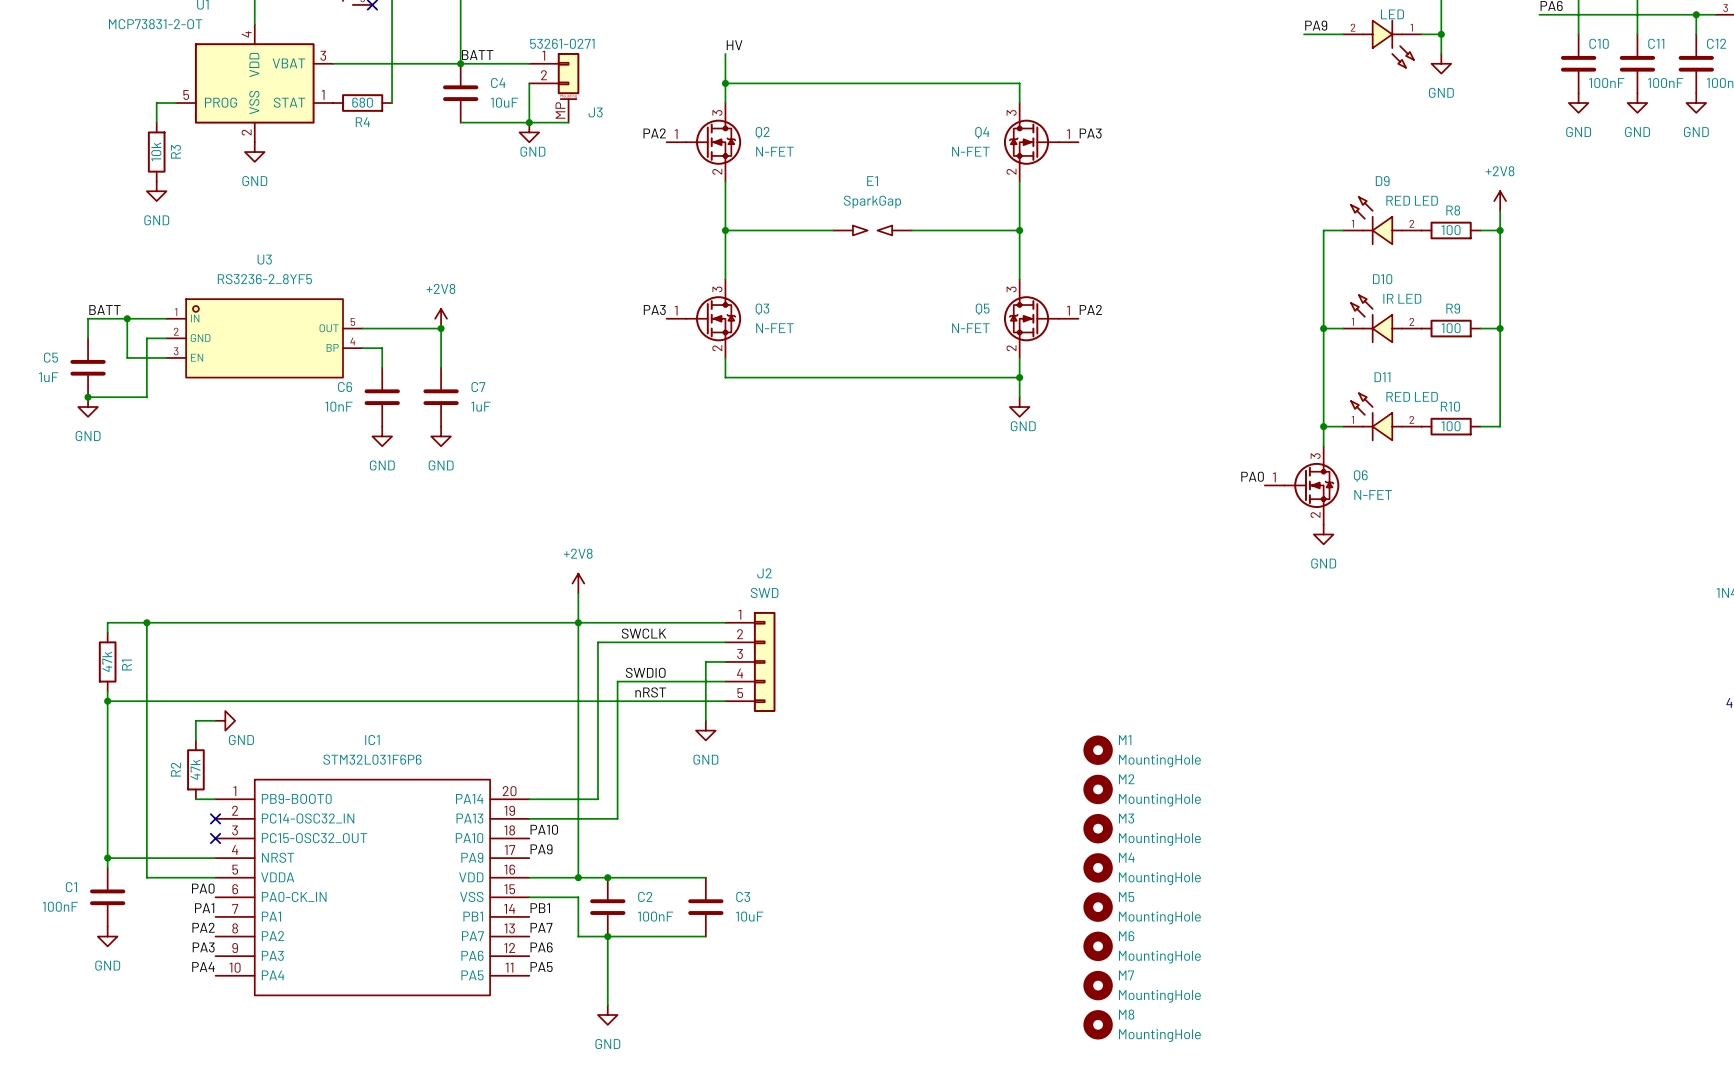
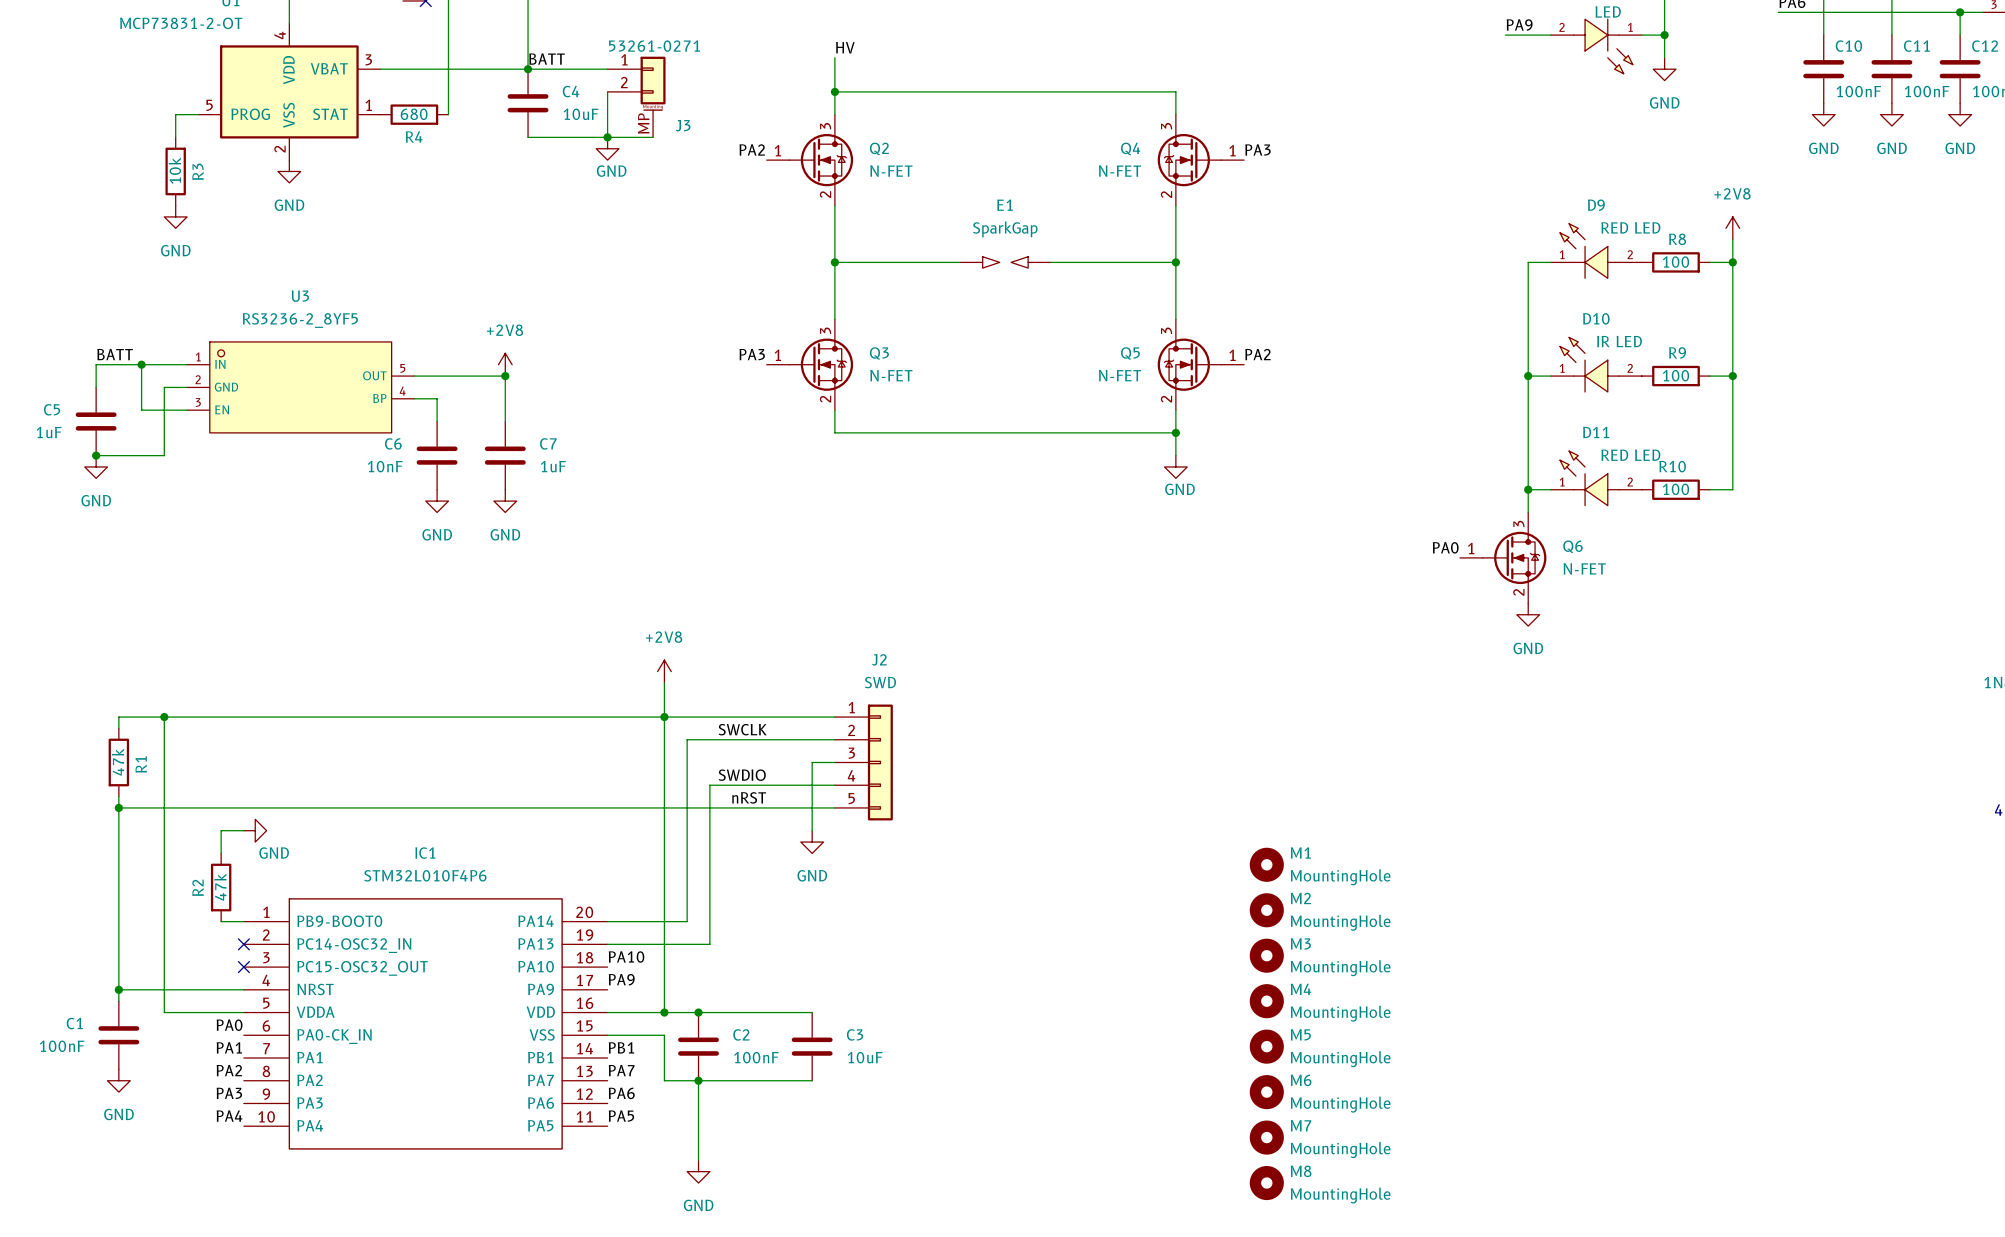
IC1 value: STM32L031F6P6 (372, 759) -> STM32L010F4P6 (425, 875)

